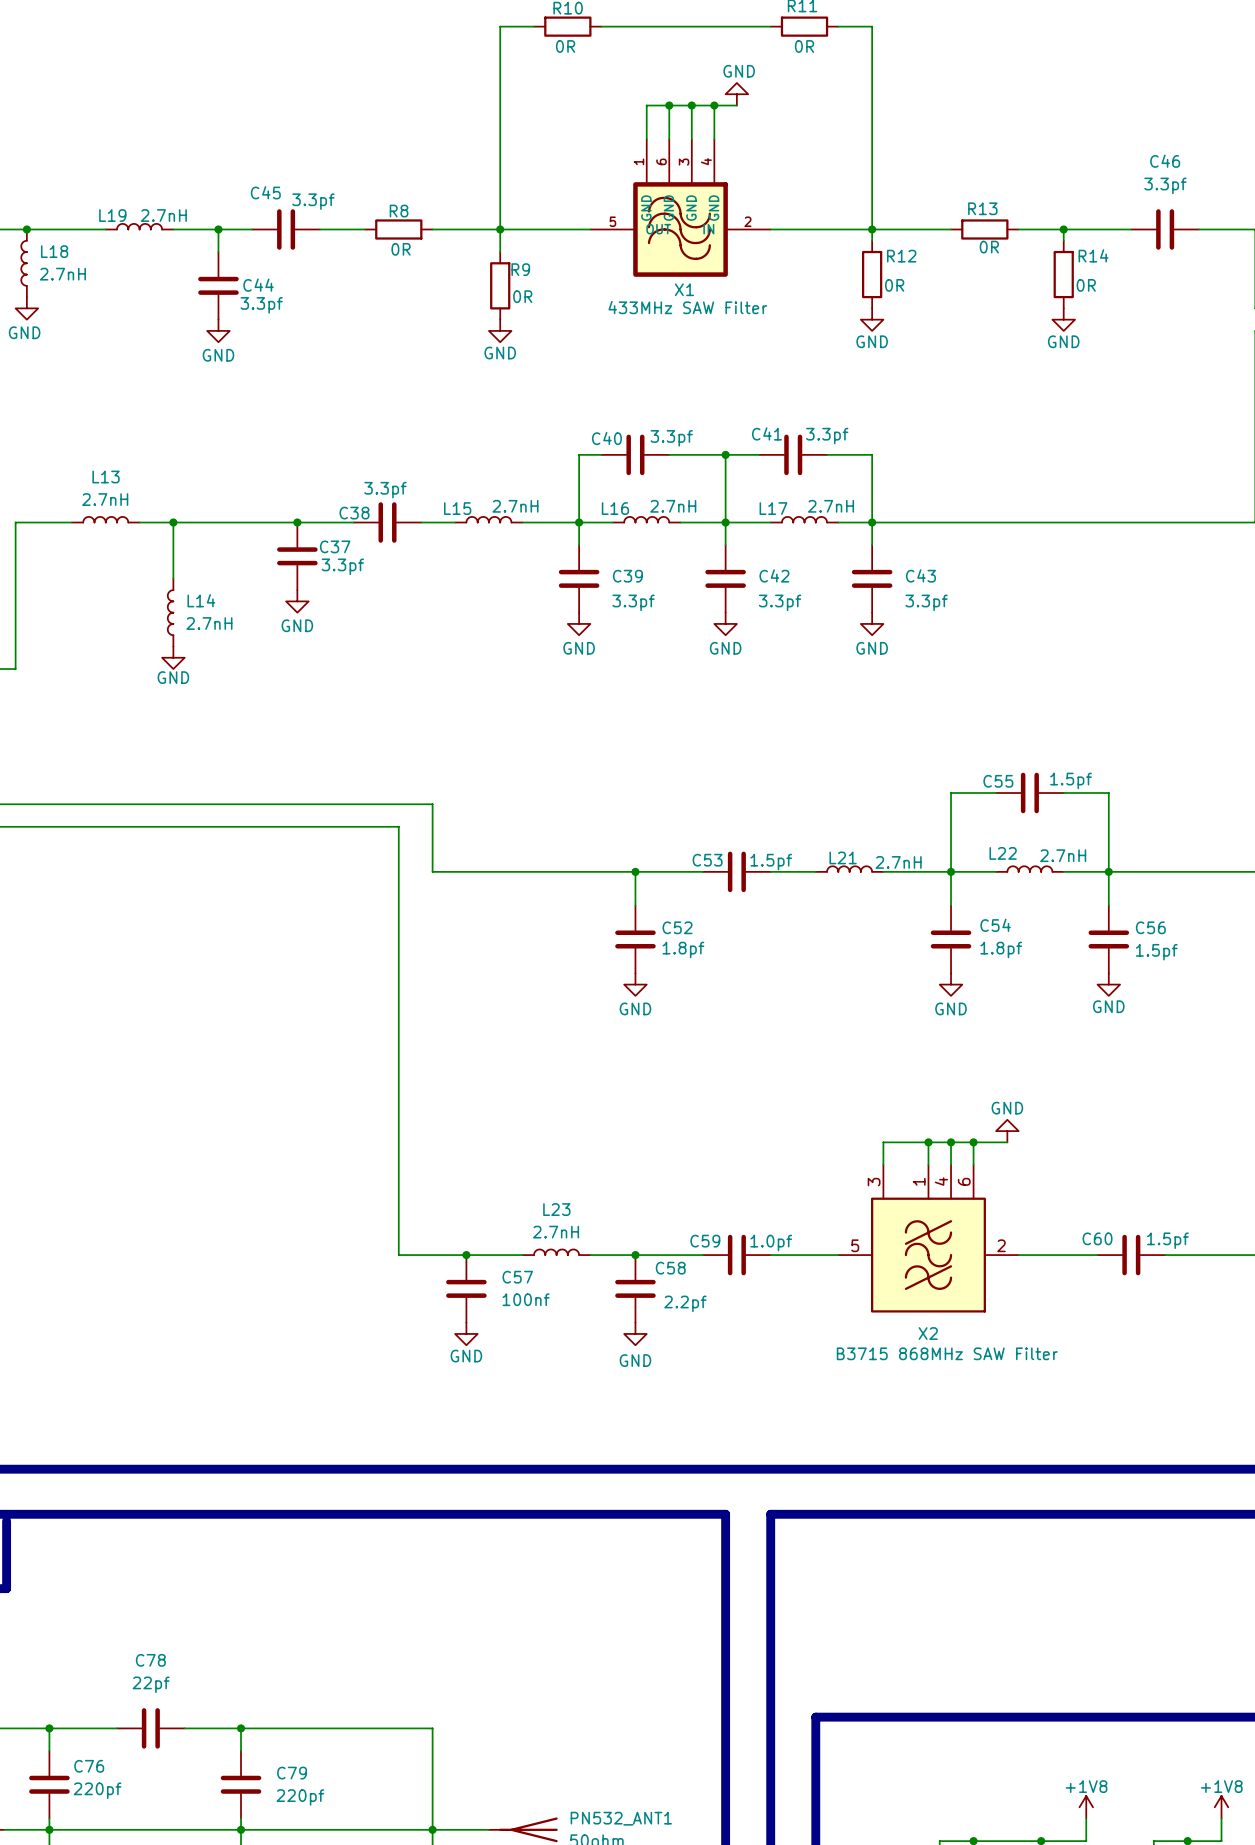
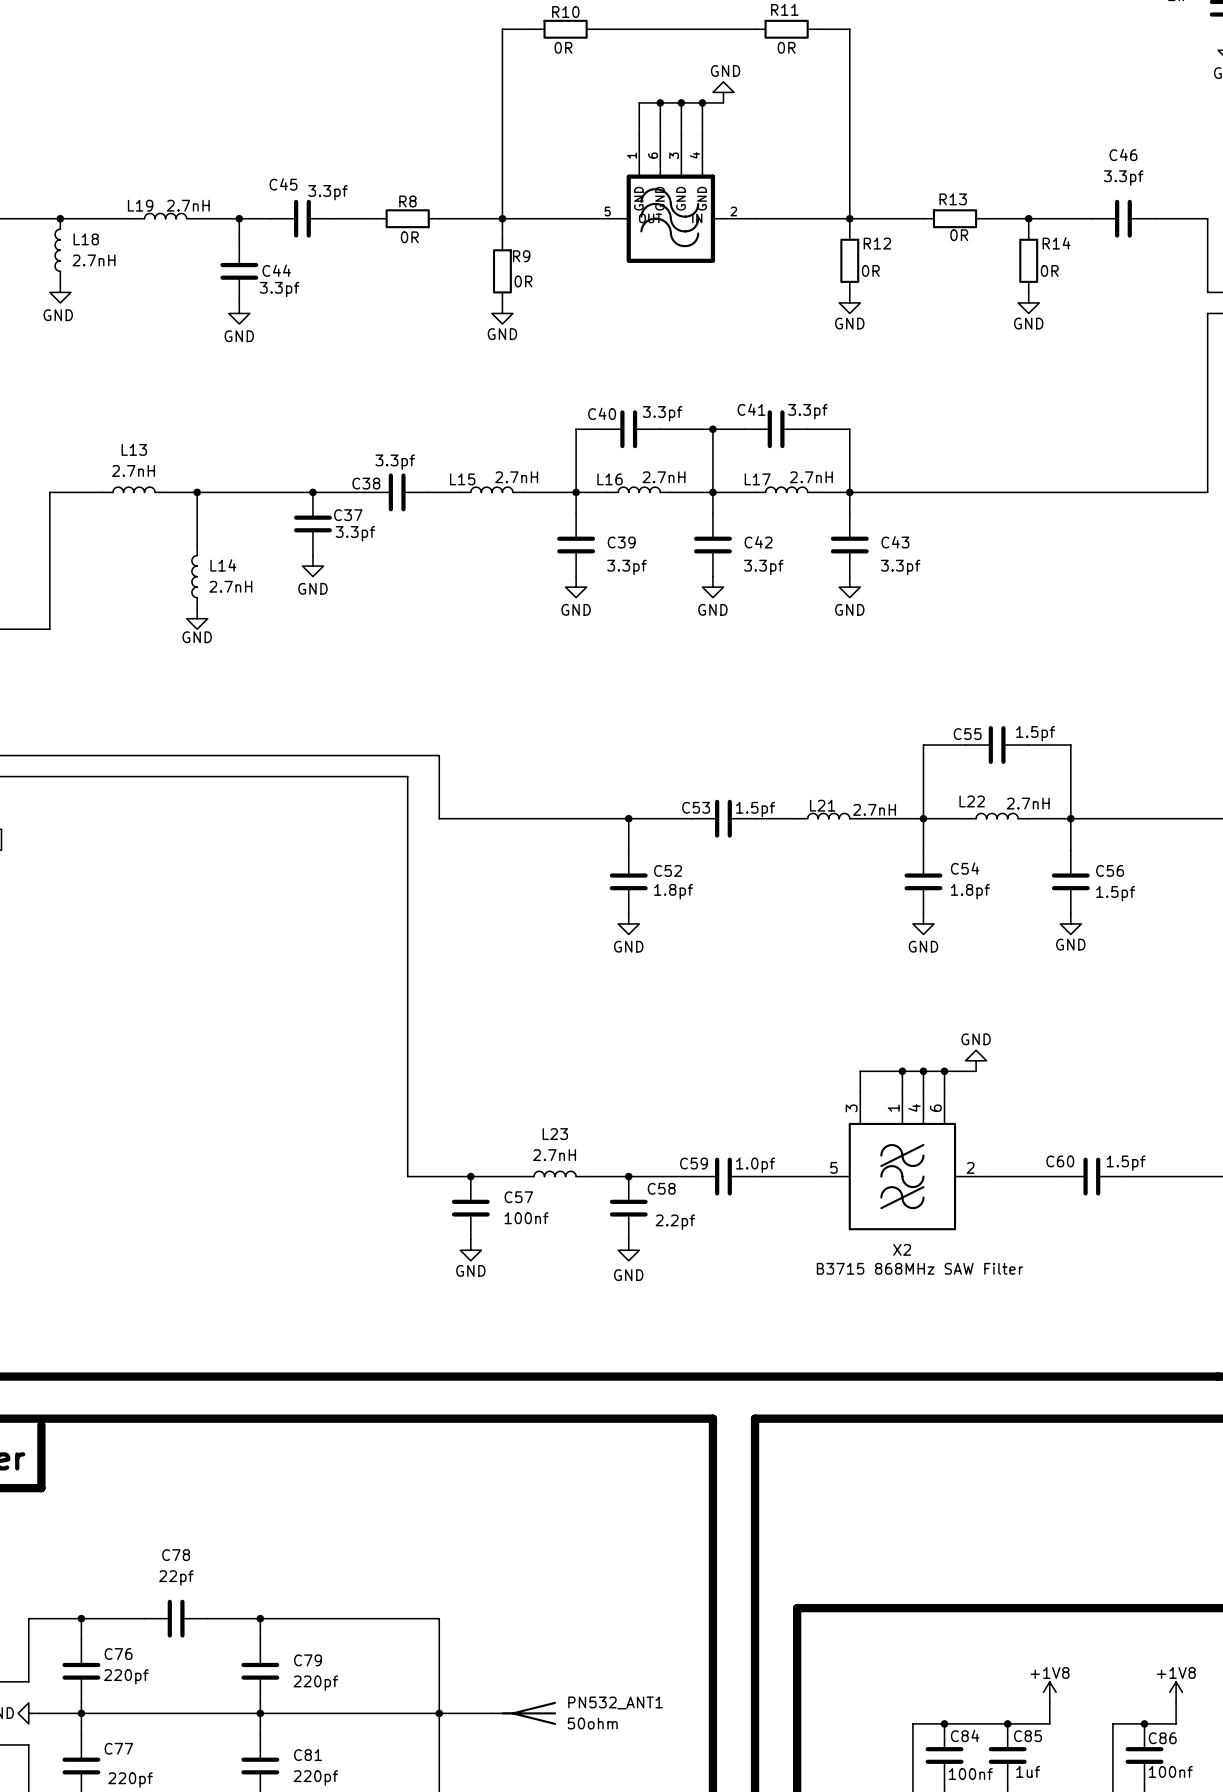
X1 name: X1 (684, 289) -> none
X1 value: 433MHz SAW Filter (687, 307) -> none

